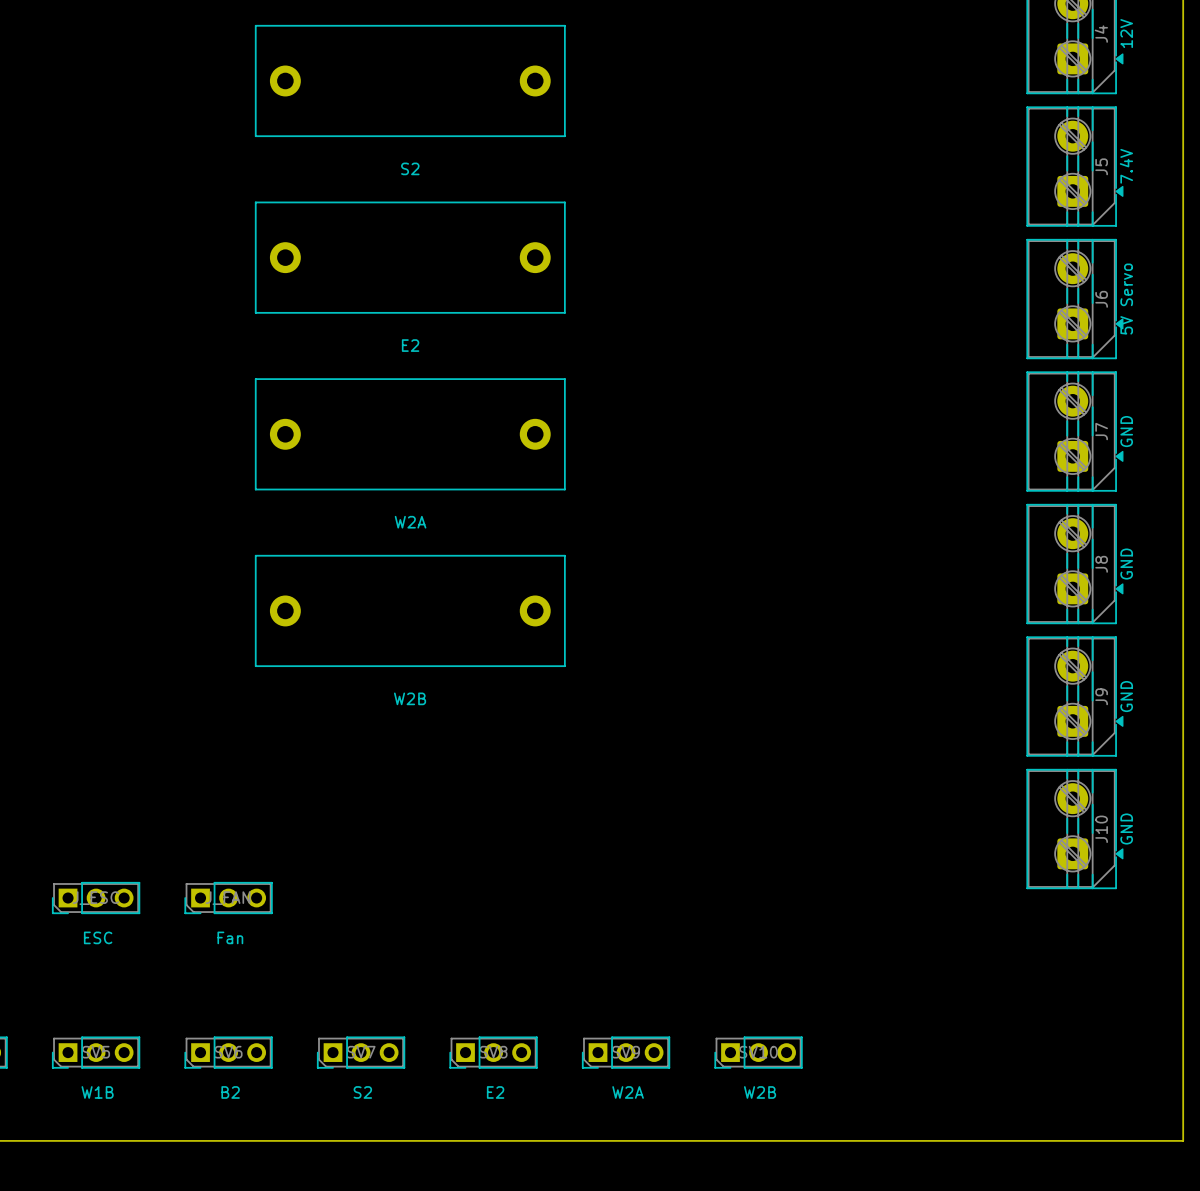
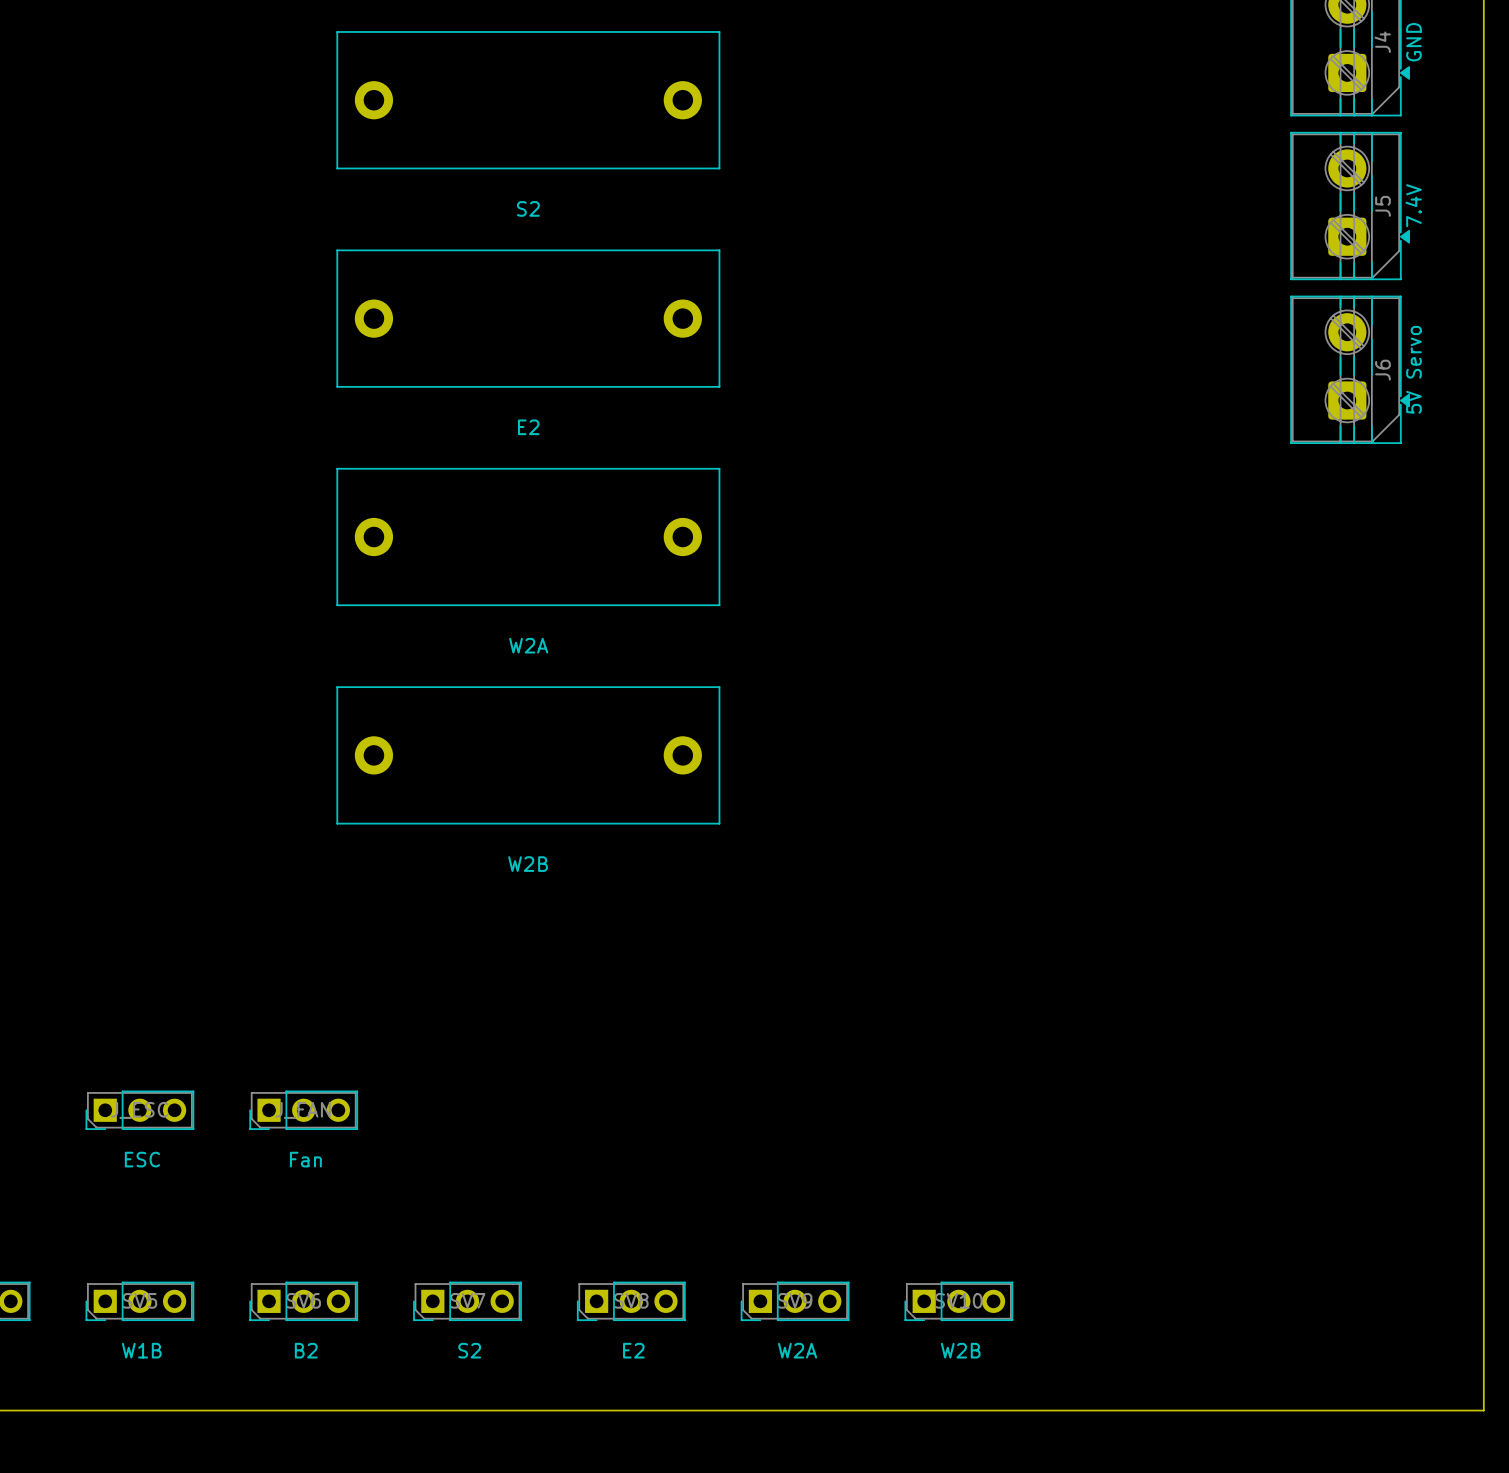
J4 value: 12V (1126, 33) -> GND (1413, 42)
J7: GND (1075, 431) -> none
J8: GND (1075, 564) -> none
J9: GND (1075, 696) -> none
J10: GND (1075, 829) -> none

